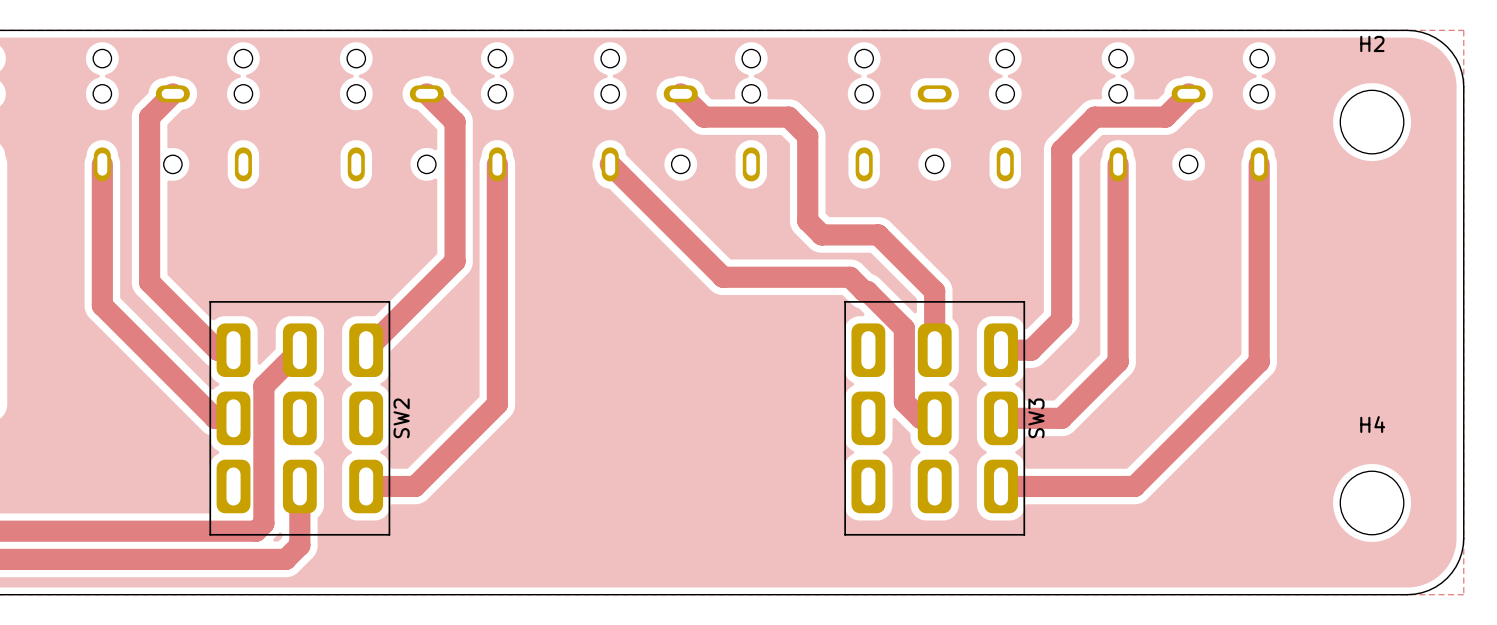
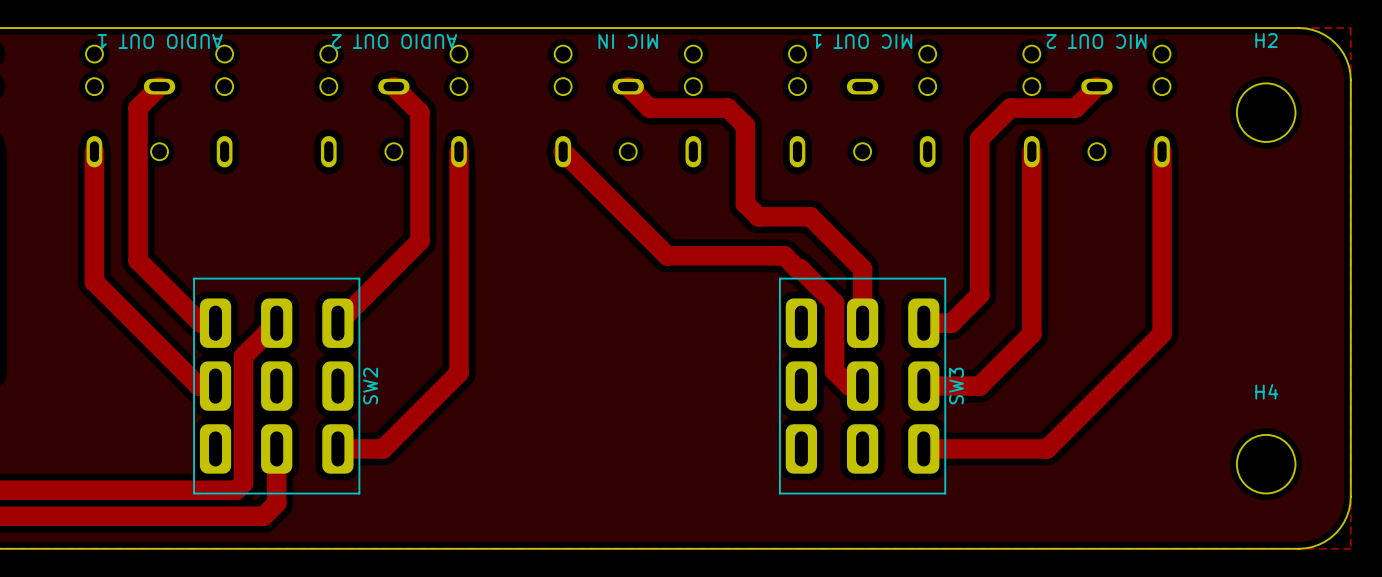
text: none -> AUDIO OUT 1 (160, 41)
text: none -> AUDIO OUT 2 (394, 41)
text: none -> MIC IN (628, 41)
text: none -> MIC OUT 1 (862, 41)
text: none -> MIC OUT 2 (1096, 41)

